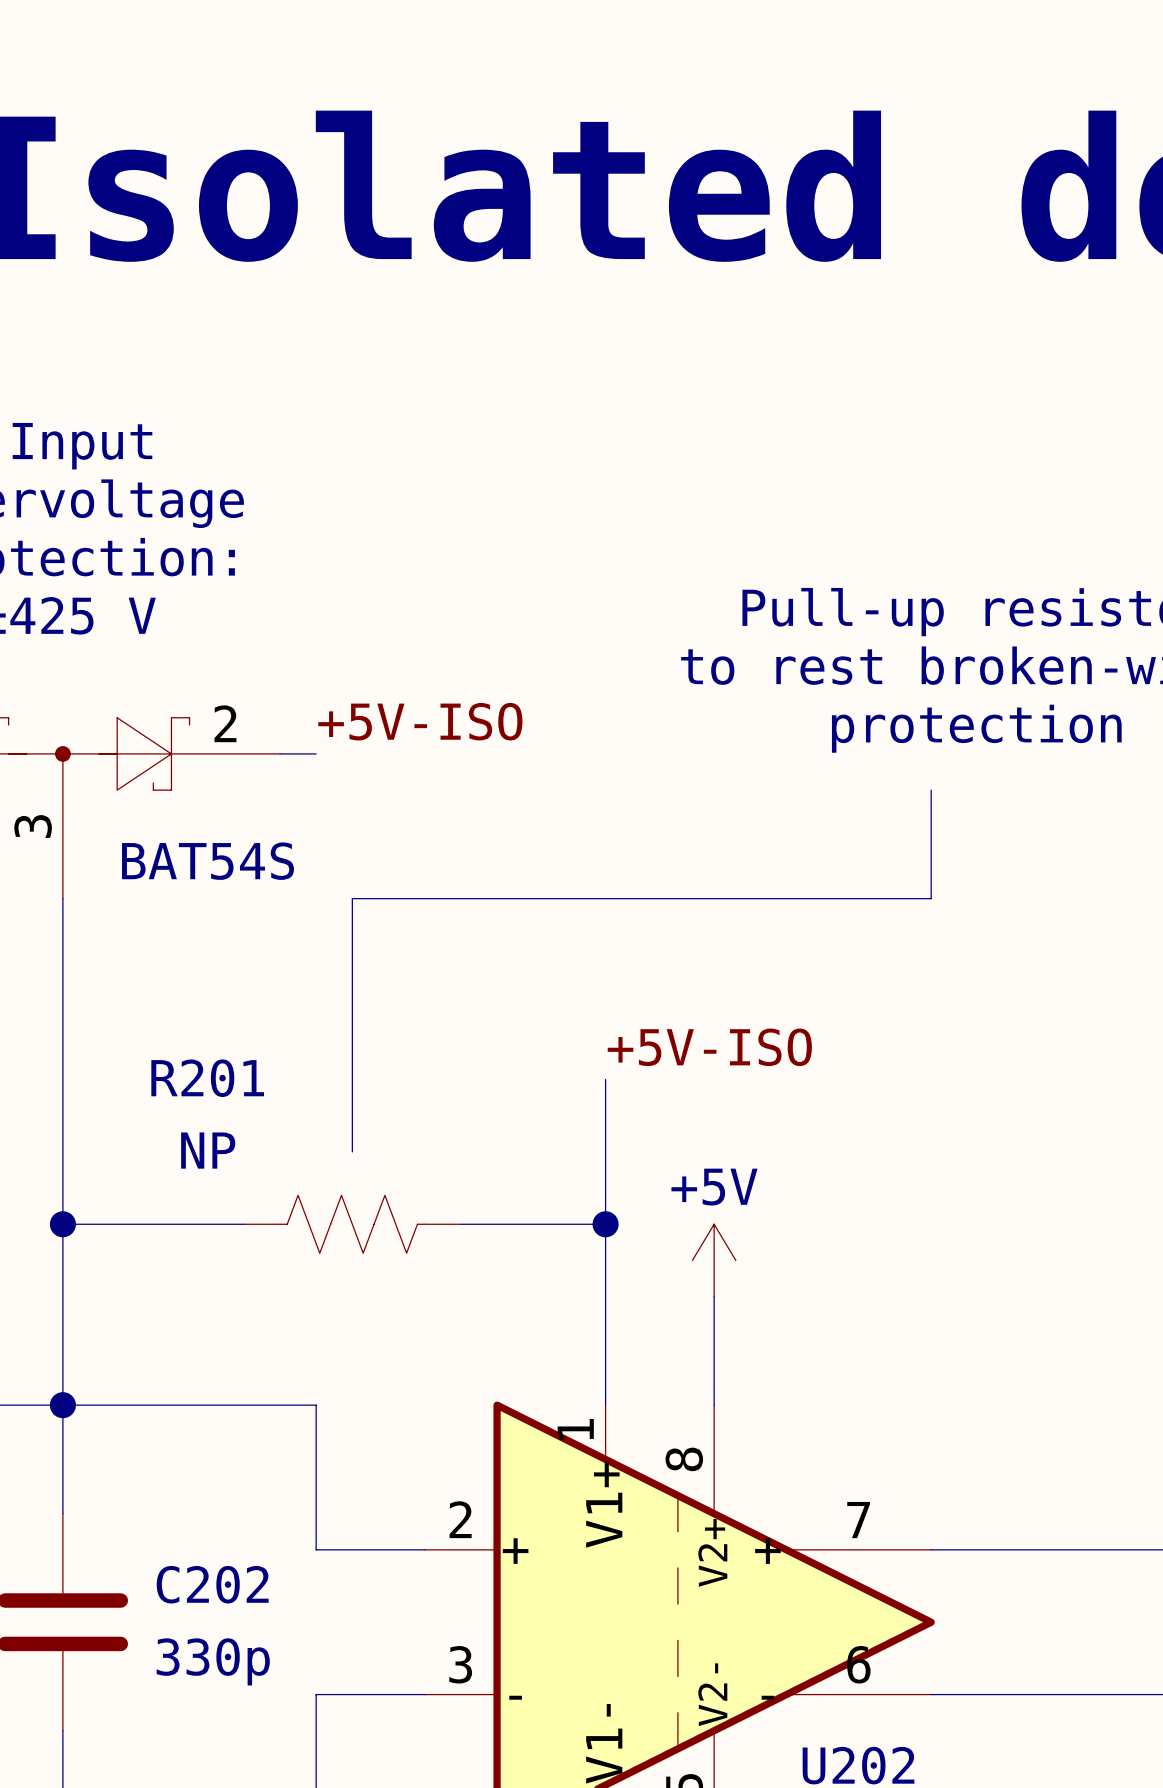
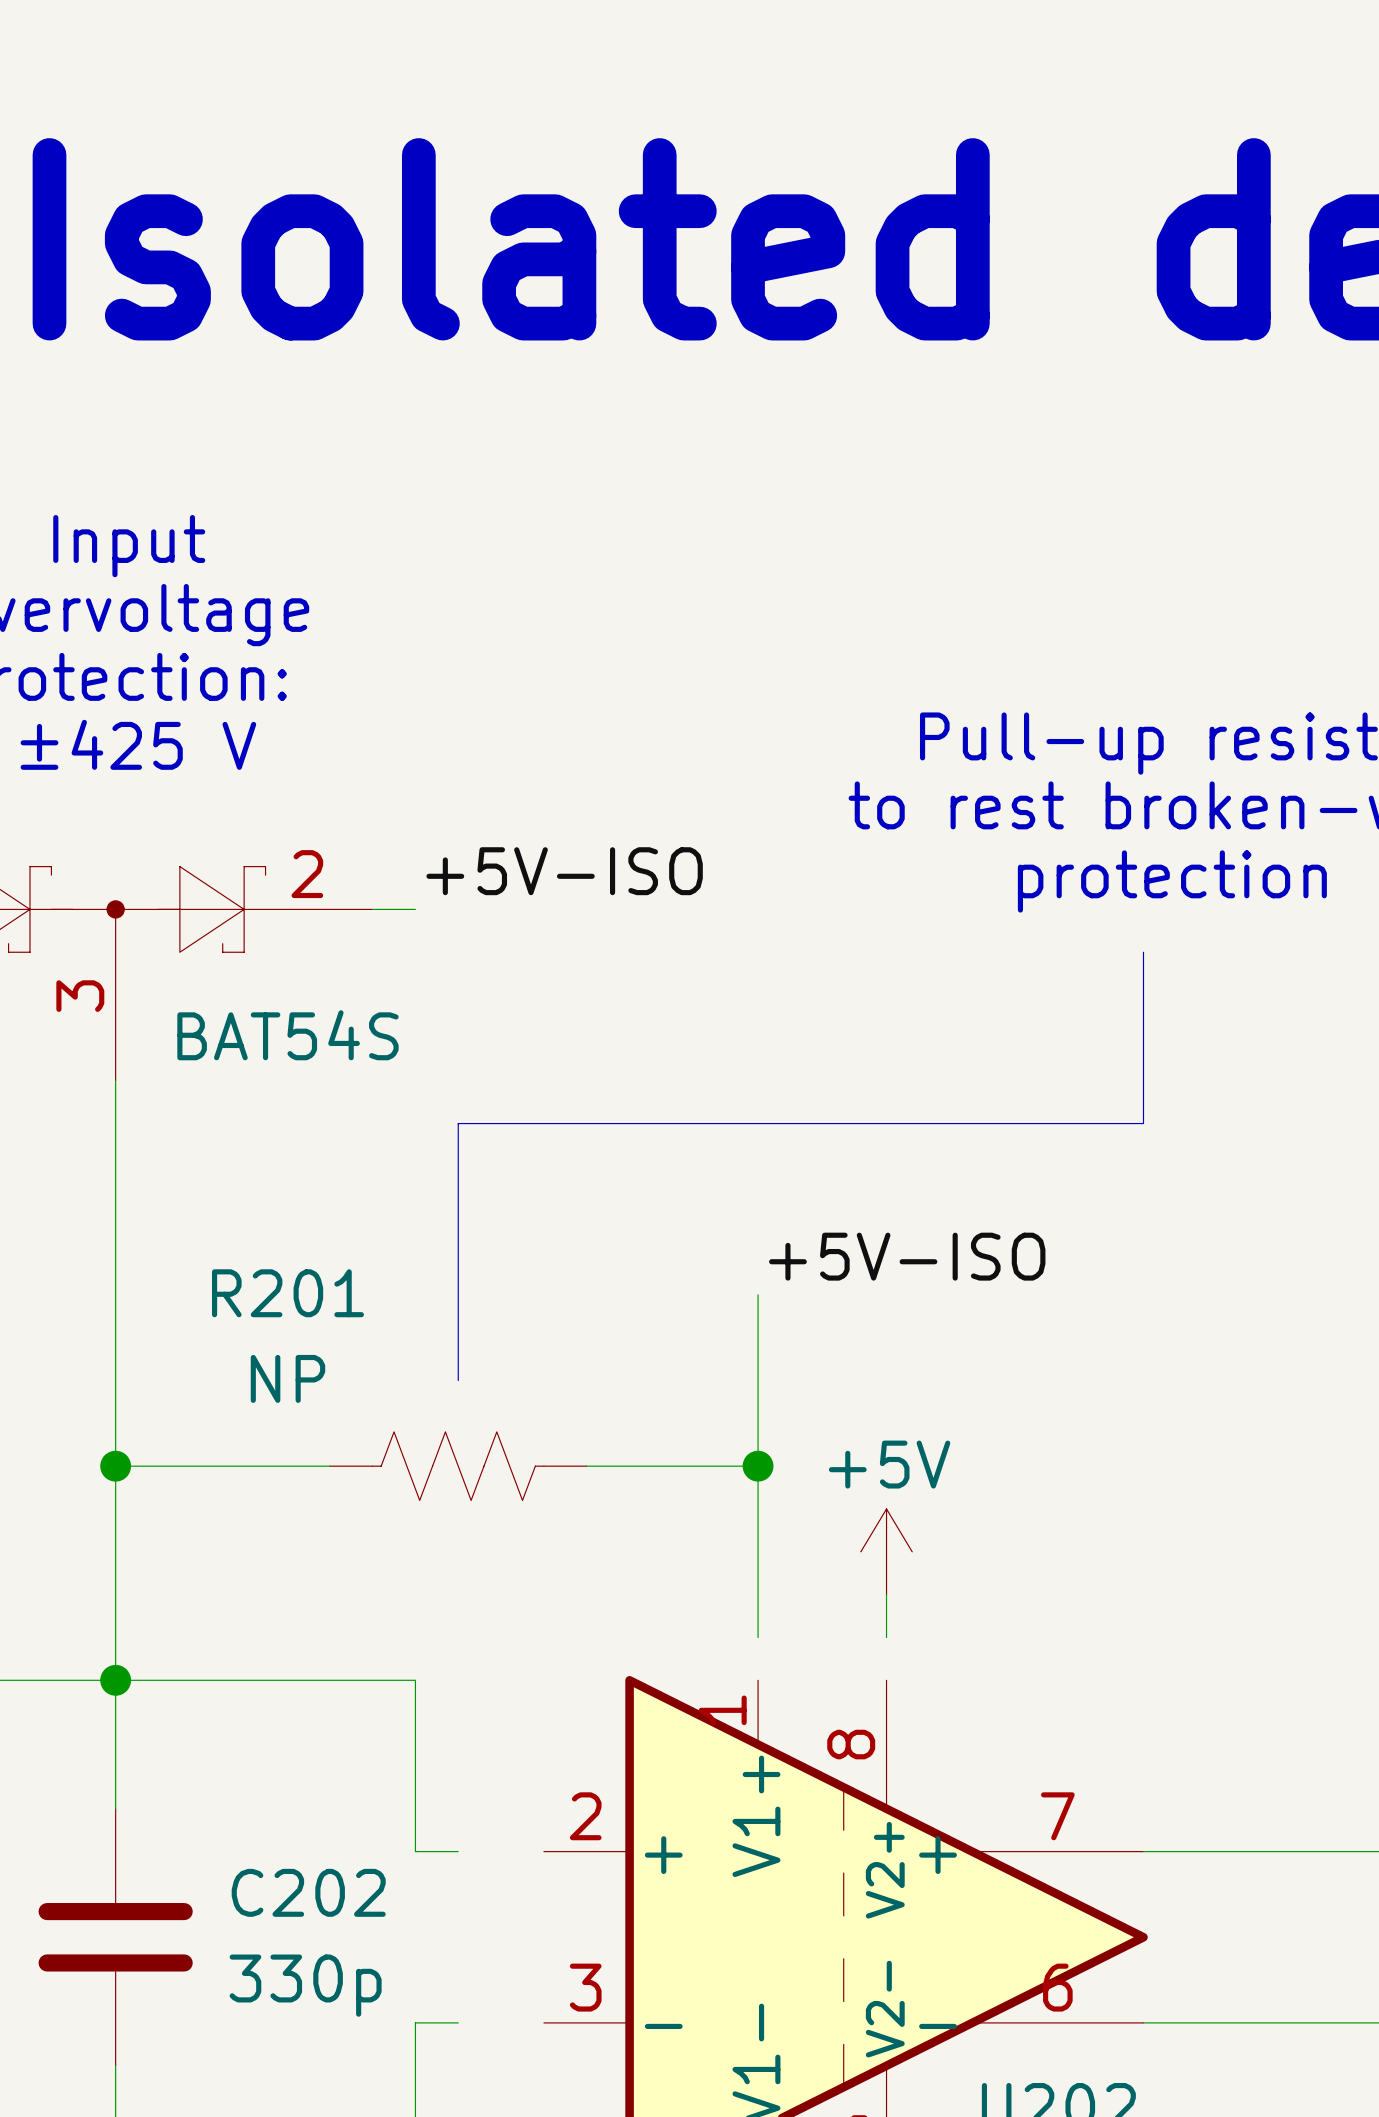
line: (931, 898) (352, 898) (352, 934) -> (1143, 1080) (1143, 1123) (458, 1123)
power symbol position: +5V (714, 1260) -> +5V (886, 1551)
wire: (605, 1368) (605, 1405) -> none
wire: (714, 1368) (714, 1405) -> none
wire: (352, 1549) (424, 1549) -> none
wire: (352, 1694) (424, 1694) -> none

